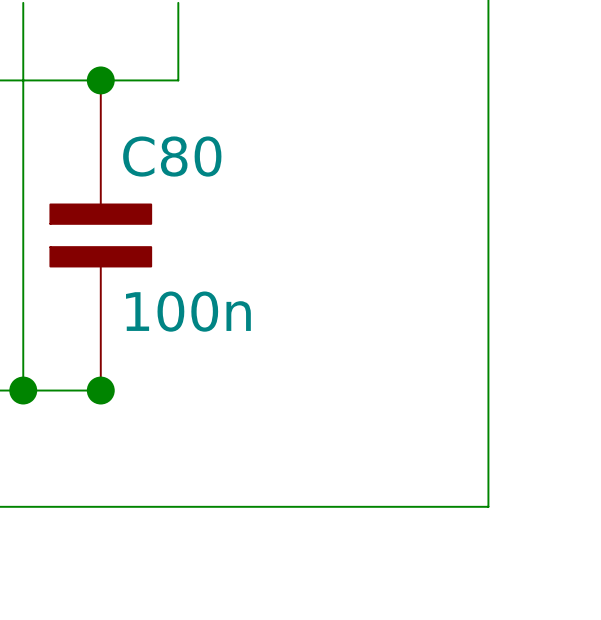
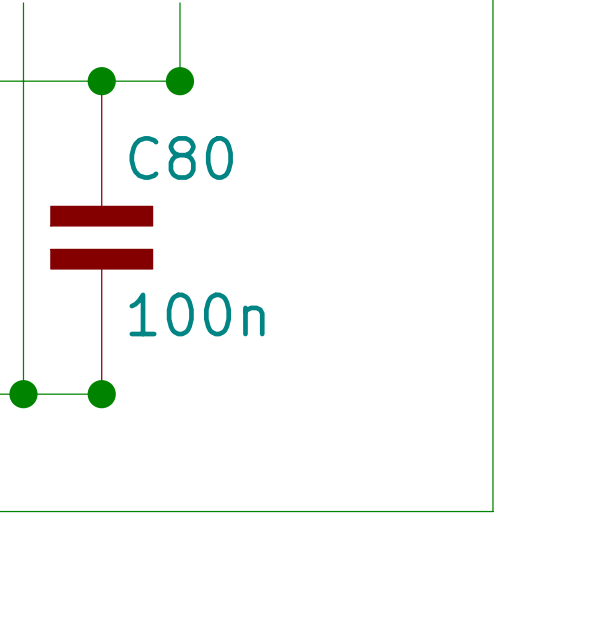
junction: none -> (179, 81)

